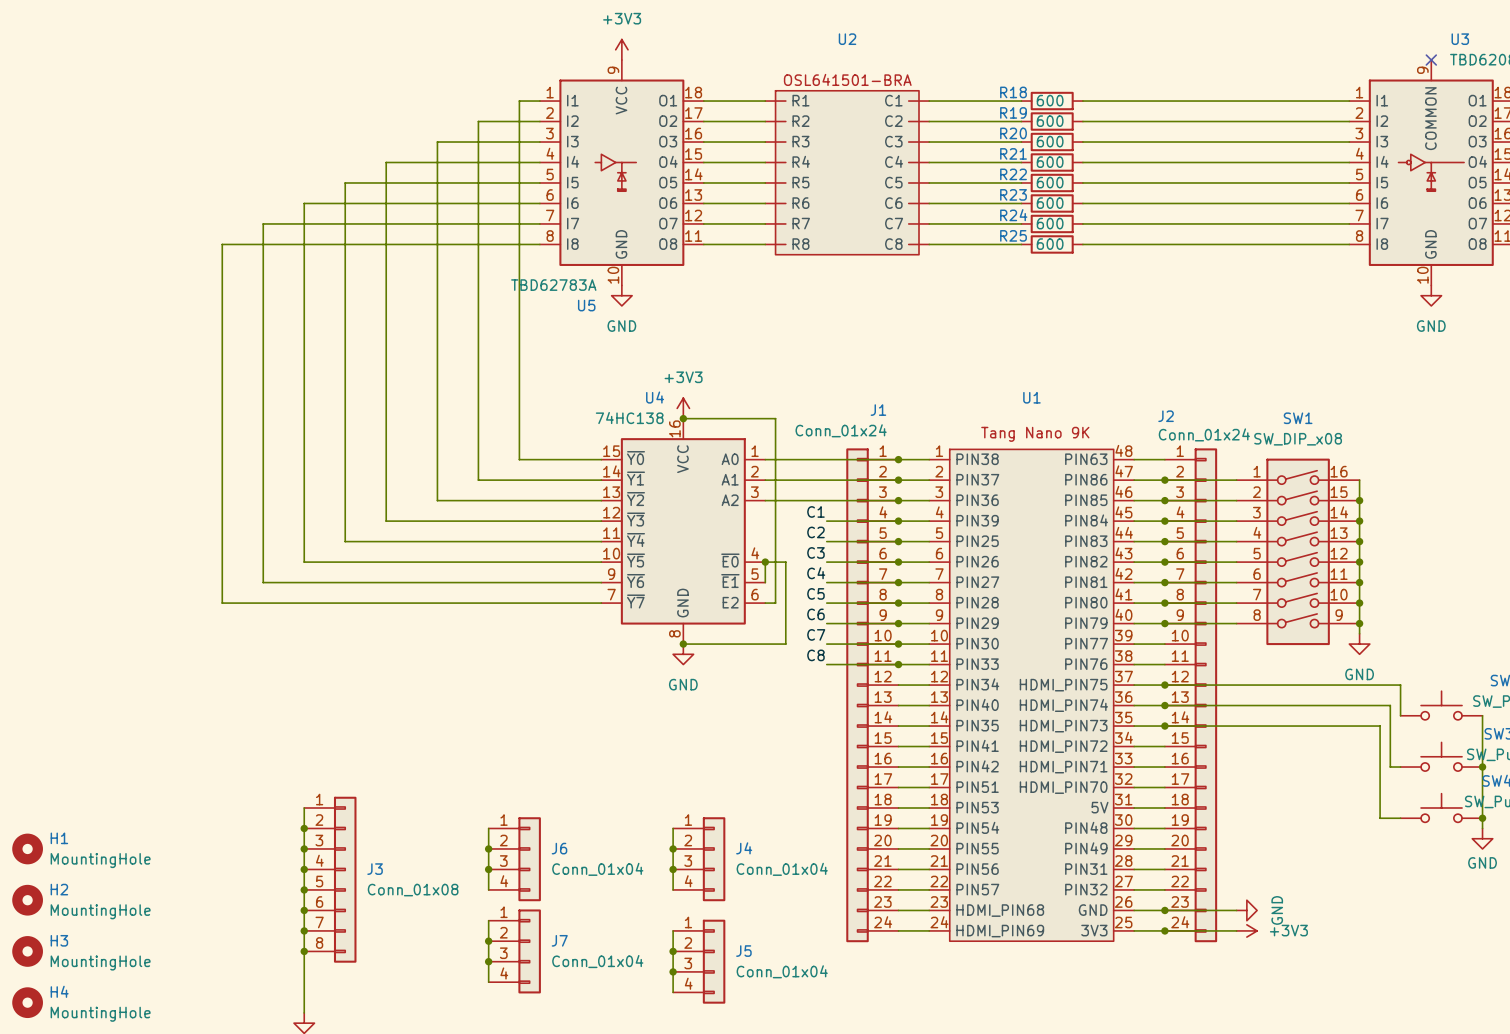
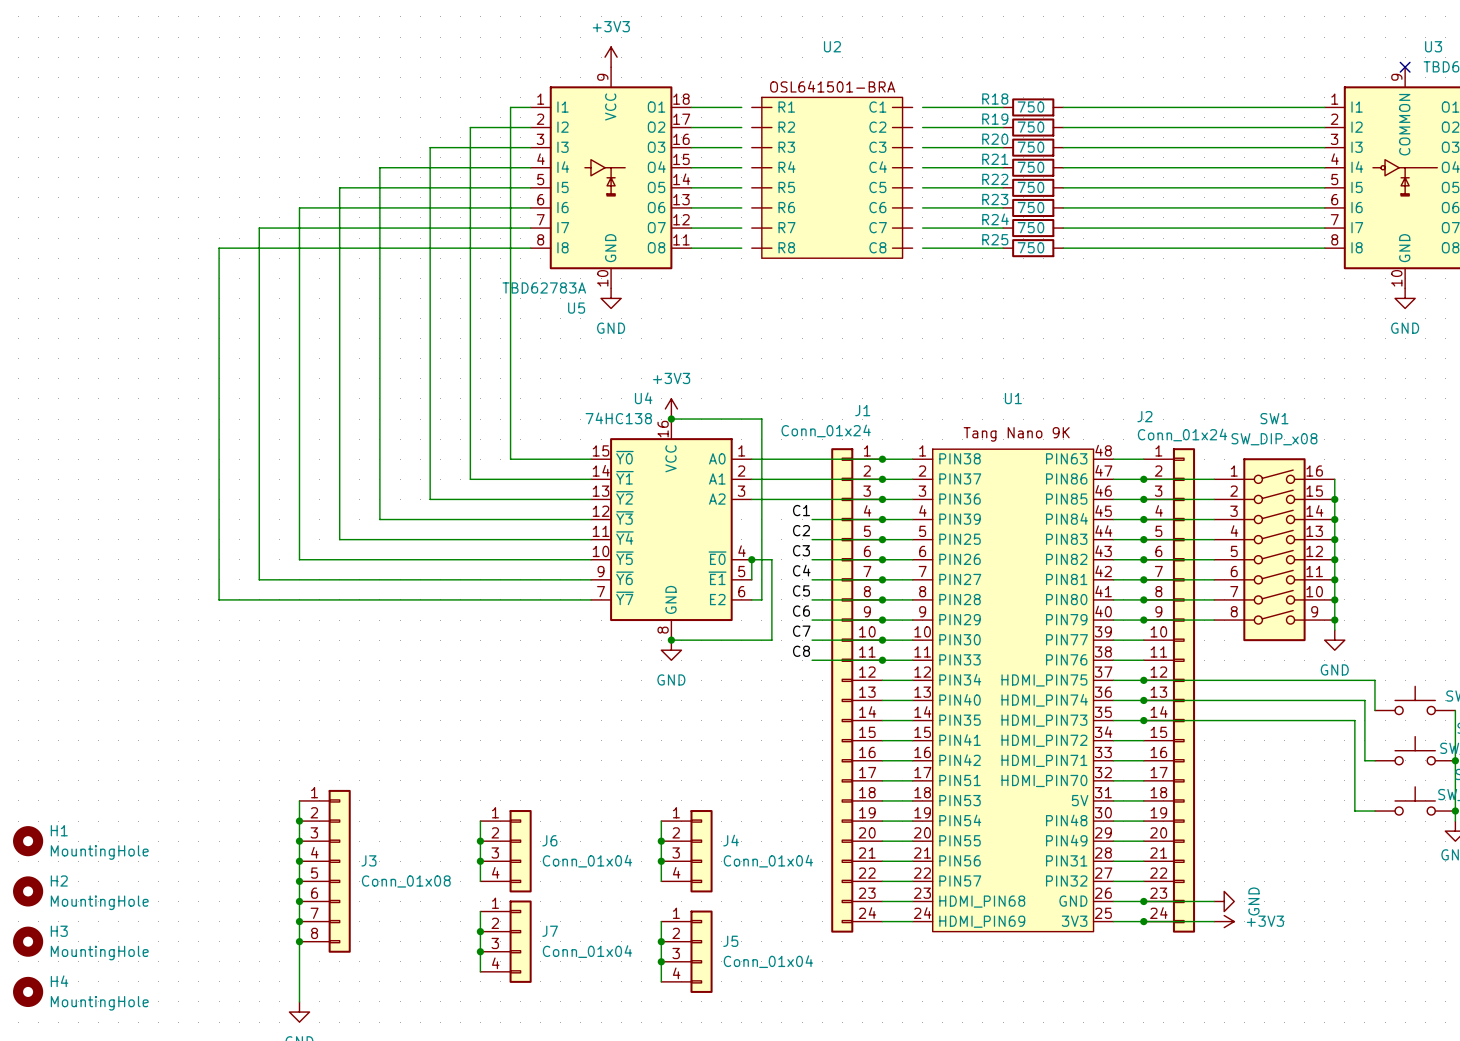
R18 value: 600 (1050, 100) -> 750 (1030, 107)
wire: (755, 101) (765, 101) -> none
wire: (929, 101) (939, 101) -> none
wire: (755, 121) (765, 121) -> none
wire: (929, 121) (939, 121) -> none
R19 value: 600 (1050, 121) -> 750 (1030, 127)
R20 value: 600 (1050, 141) -> 750 (1030, 147)
wire: (755, 142) (765, 142) -> none
wire: (929, 142) (939, 142) -> none
wire: (755, 162) (765, 162) -> none
wire: (929, 162) (939, 162) -> none
R21 value: 600 (1050, 162) -> 750 (1030, 167)
wire: (755, 182) (765, 182) -> none
wire: (929, 182) (939, 182) -> none
R22 value: 600 (1050, 182) -> 750 (1030, 187)
wire: (755, 203) (765, 203) -> none
wire: (929, 203) (939, 203) -> none
R23 value: 600 (1050, 203) -> 750 (1030, 207)
wire: (755, 223) (765, 223) -> none
wire: (929, 223) (939, 223) -> none
R24 value: 600 (1050, 223) -> 750 (1030, 227)
wire: (755, 244) (765, 244) -> none
wire: (929, 244) (939, 244) -> none
R25 value: 600 (1050, 244) -> 750 (1030, 247)

